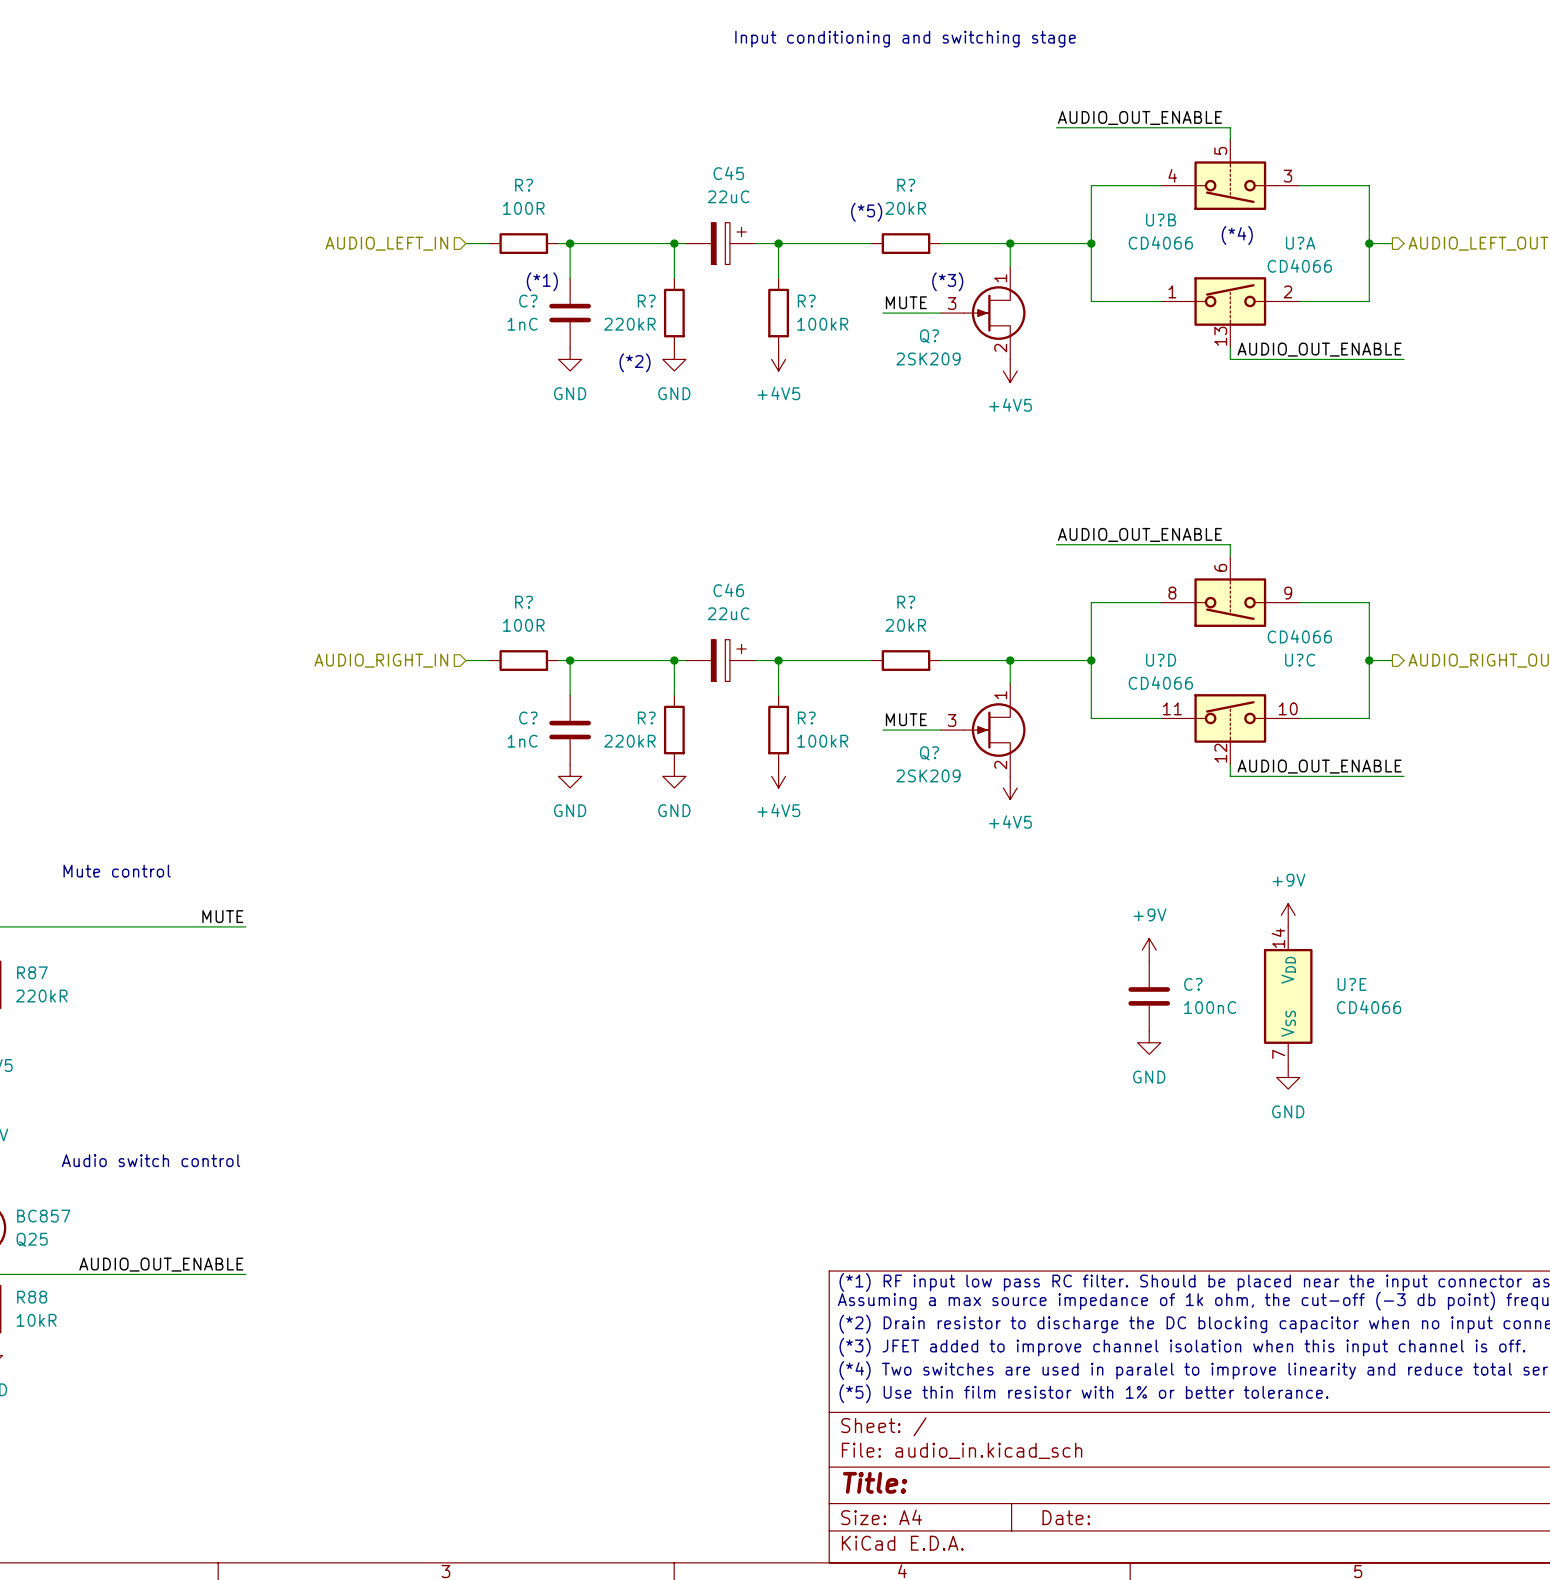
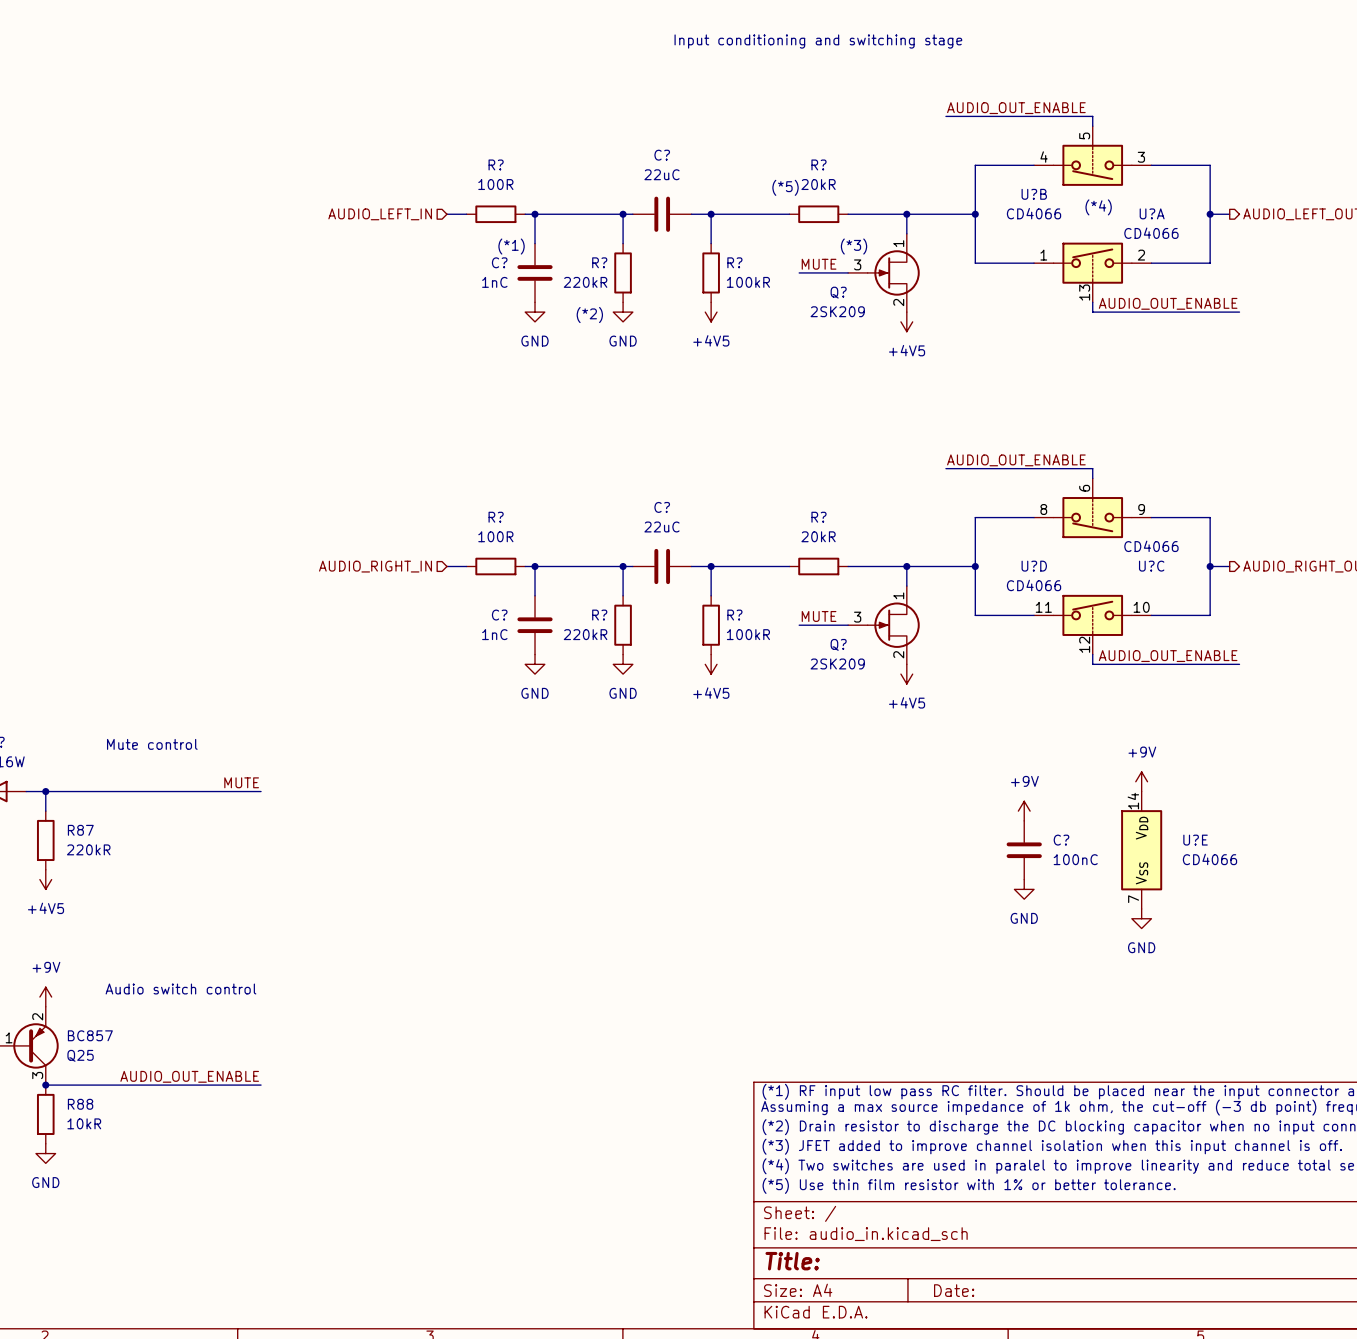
C45: 22uC (720, 243) -> none
C?: none -> 22uC (662, 214)
C46: 22uC (720, 660) -> none
C?: none -> 22uC (662, 566)

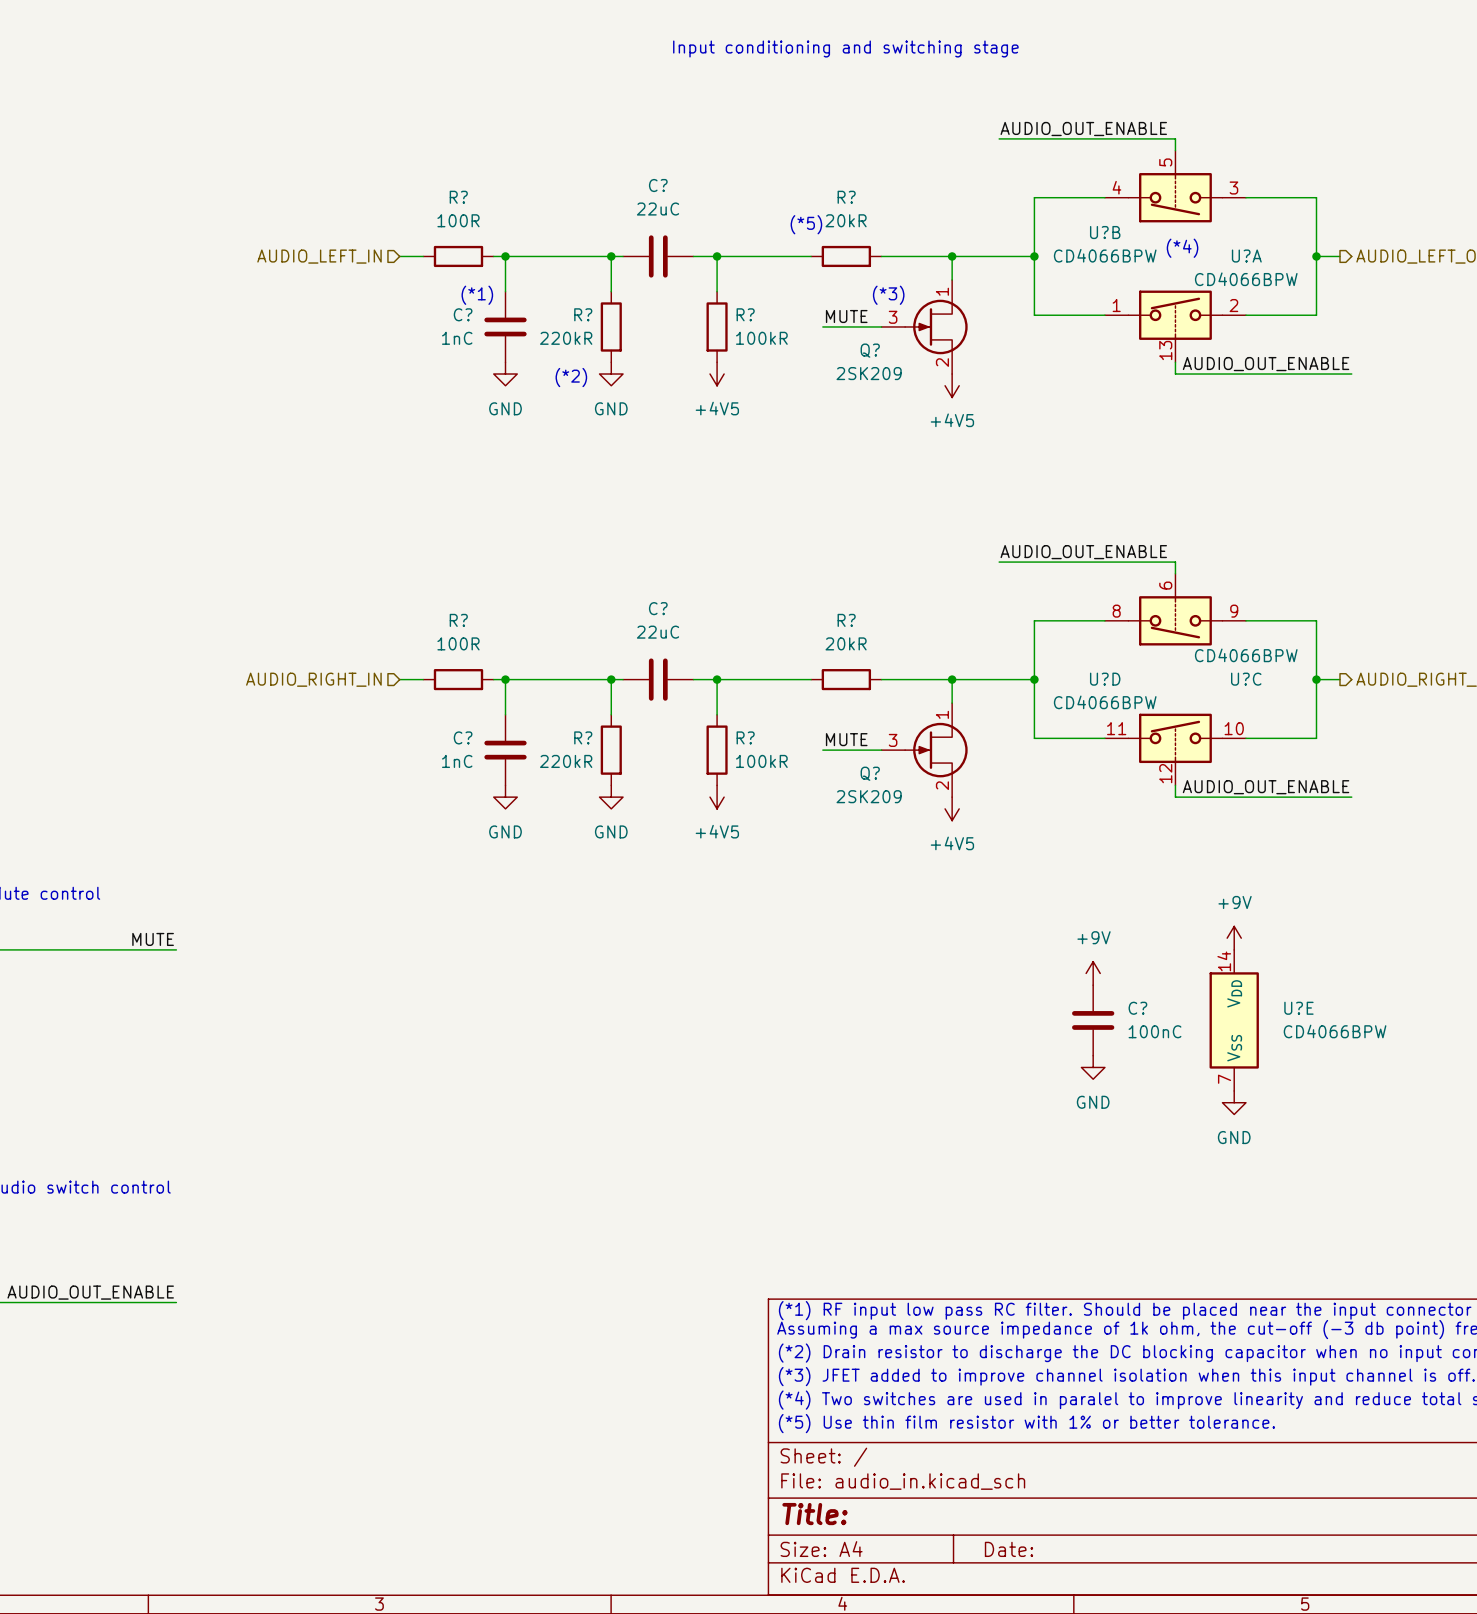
U?B value: CD4066 (1034, 213) -> CD4066BPW (1105, 255)
U?A value: CD4066 (1151, 233) -> CD4066BPW (1246, 279)
U?C value: CD4066 (1151, 546) -> CD4066BPW (1246, 655)
U?D value: CD4066 (1034, 585) -> CD4066BPW (1105, 702)
U?E value: CD4066 (1209, 859) -> CD4066BPW (1335, 1031)

